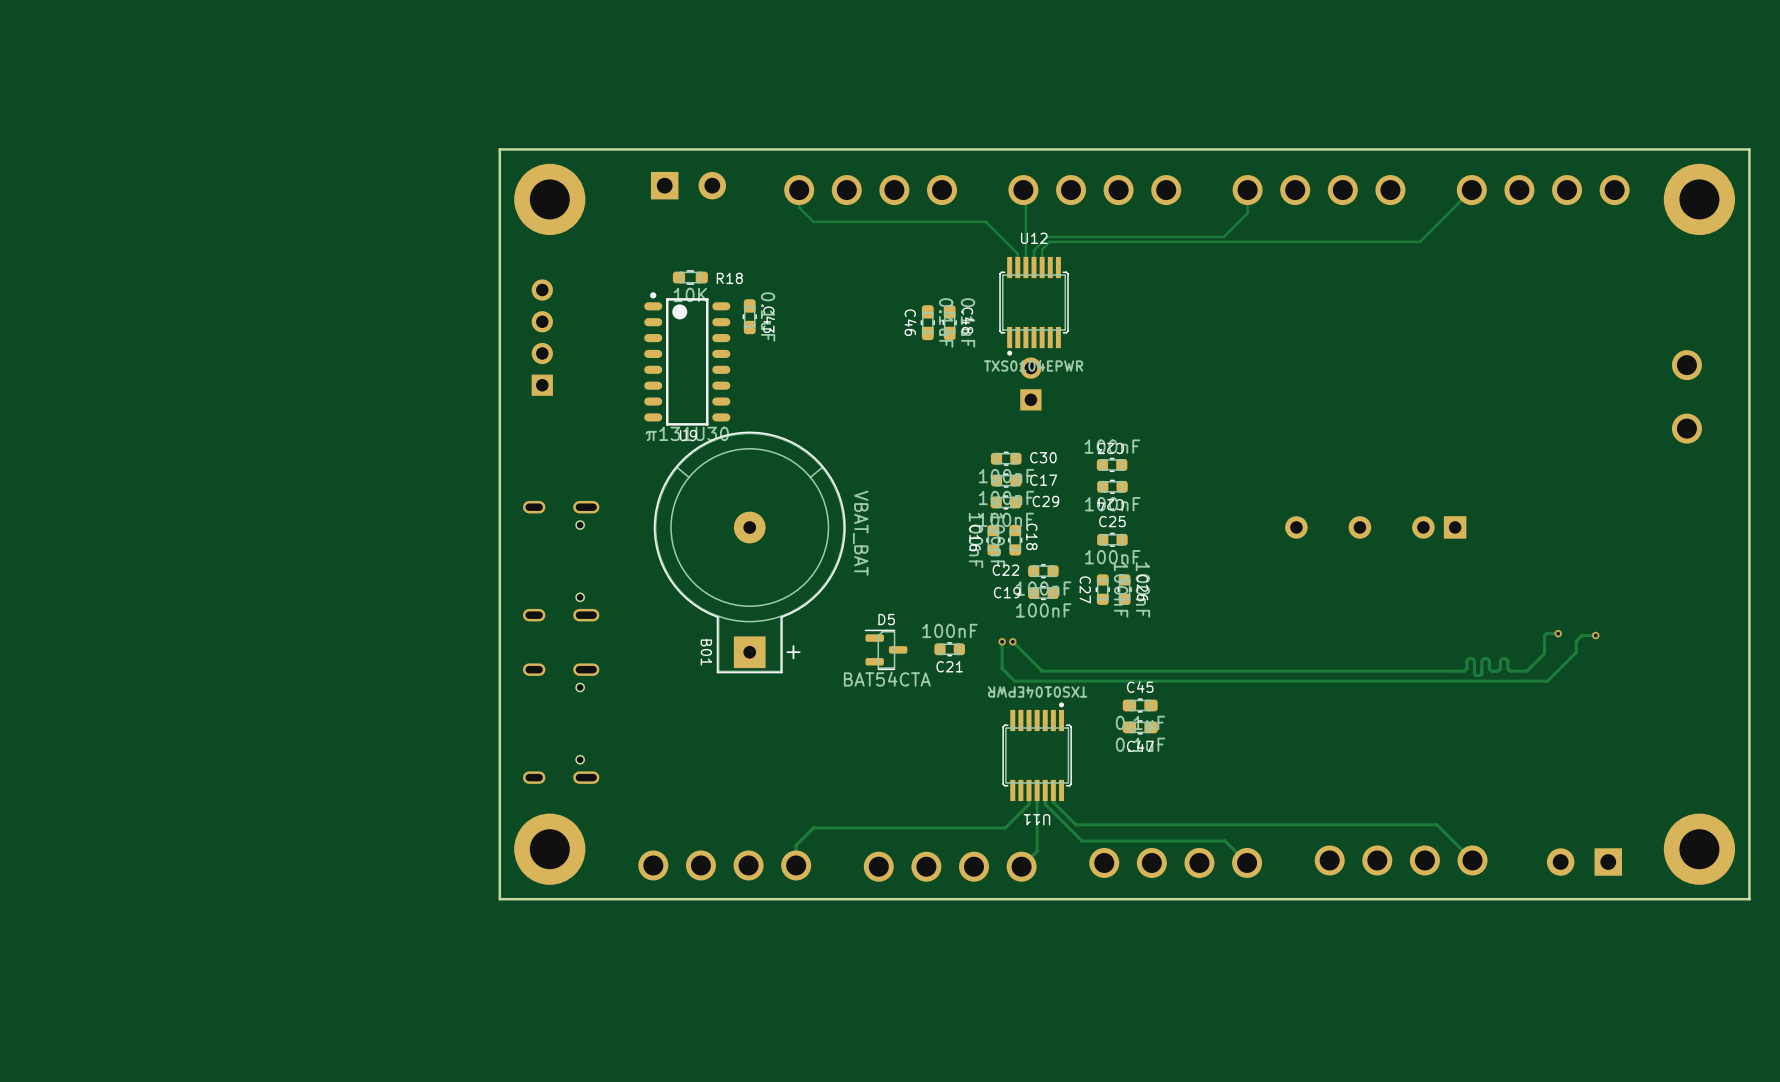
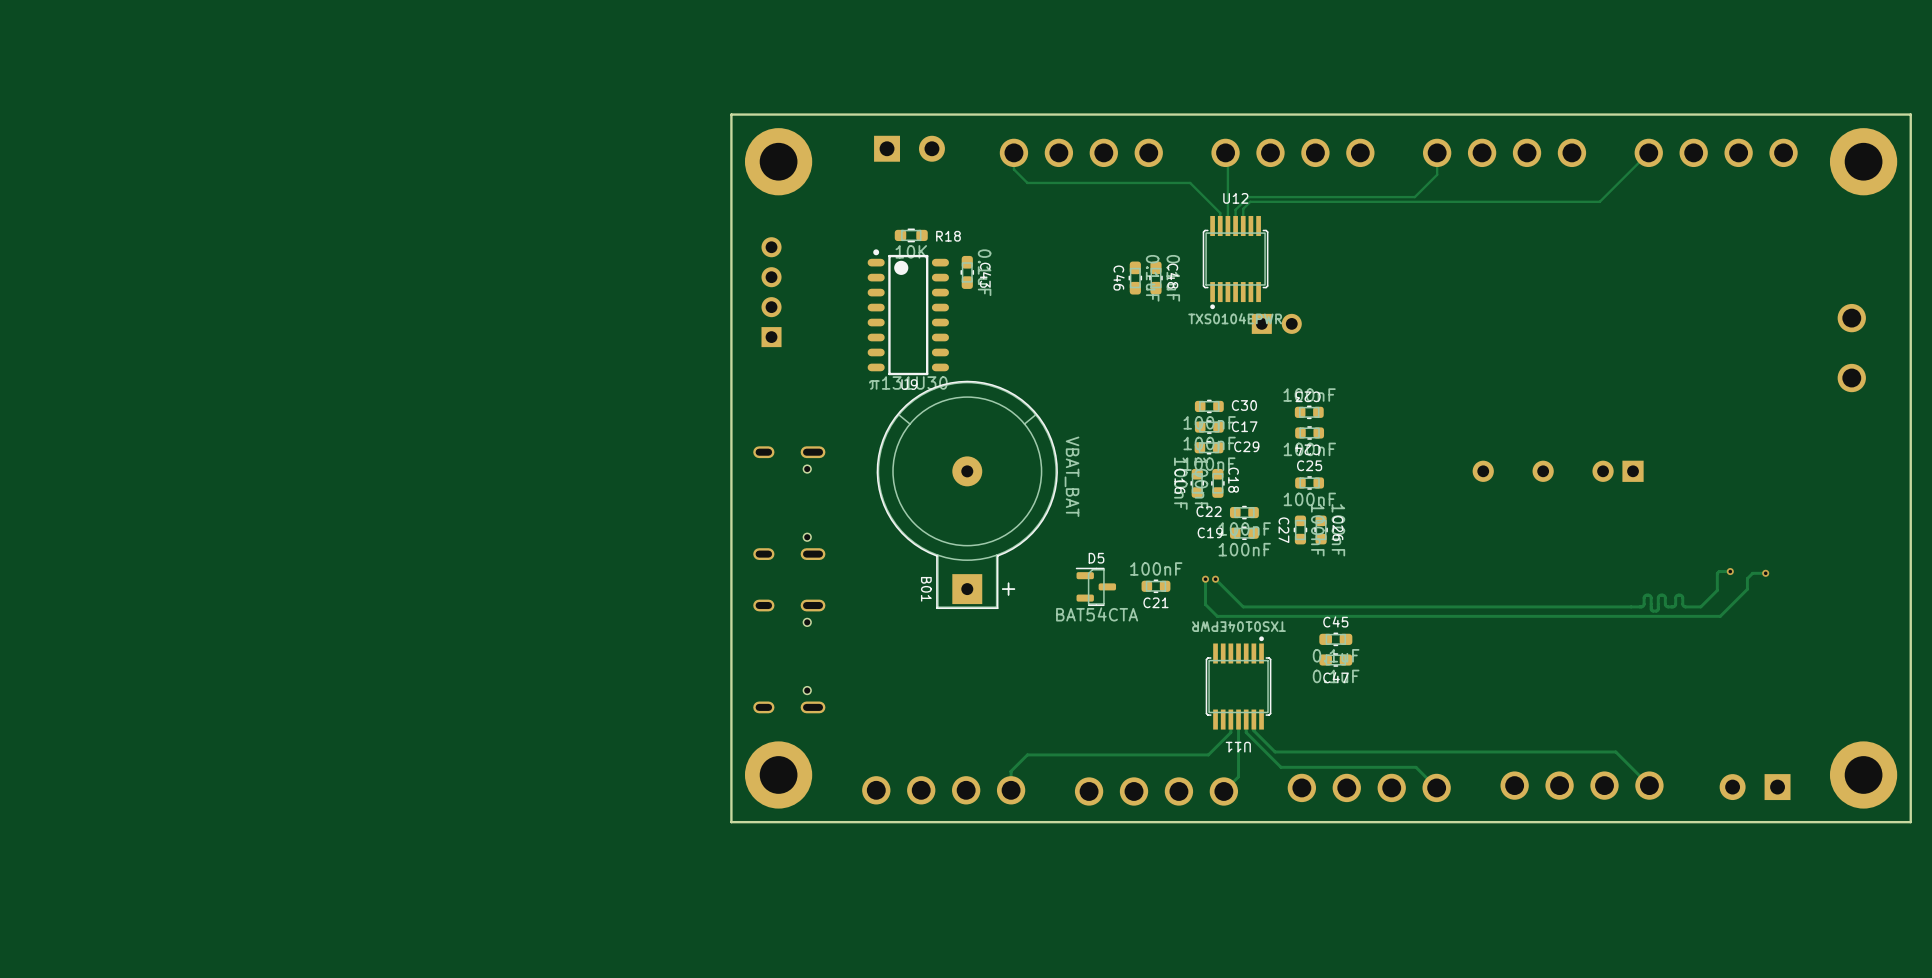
part rotation: 0° (1030, 383) -> 90° clockwise (1276, 323)
part position: (1030, 383) -> (1276, 323)

